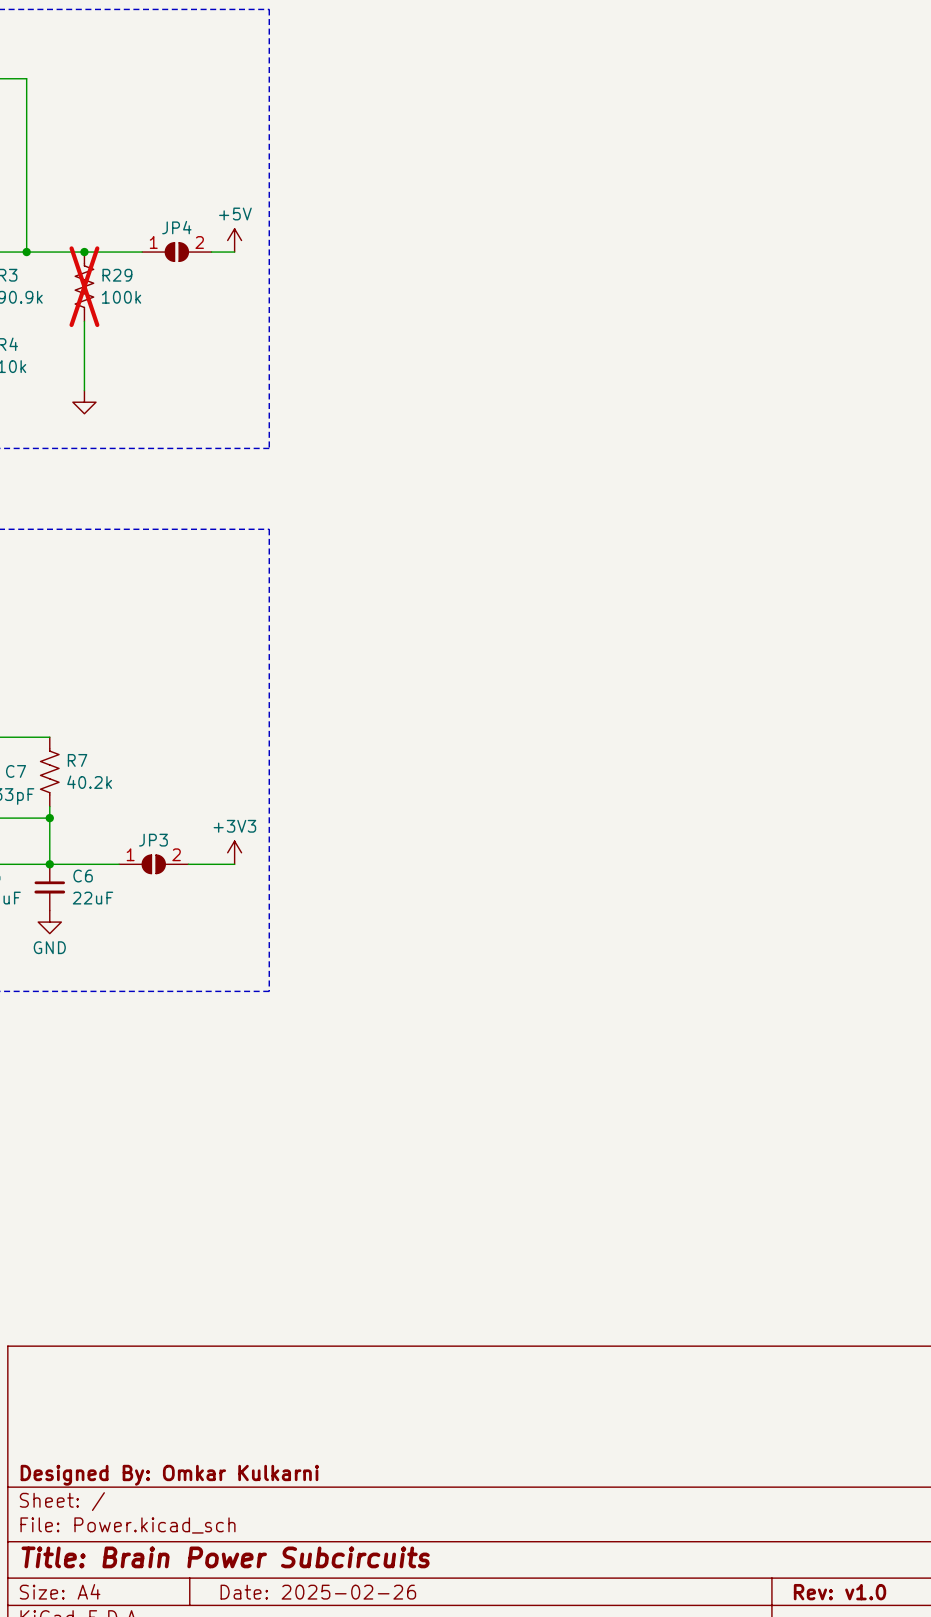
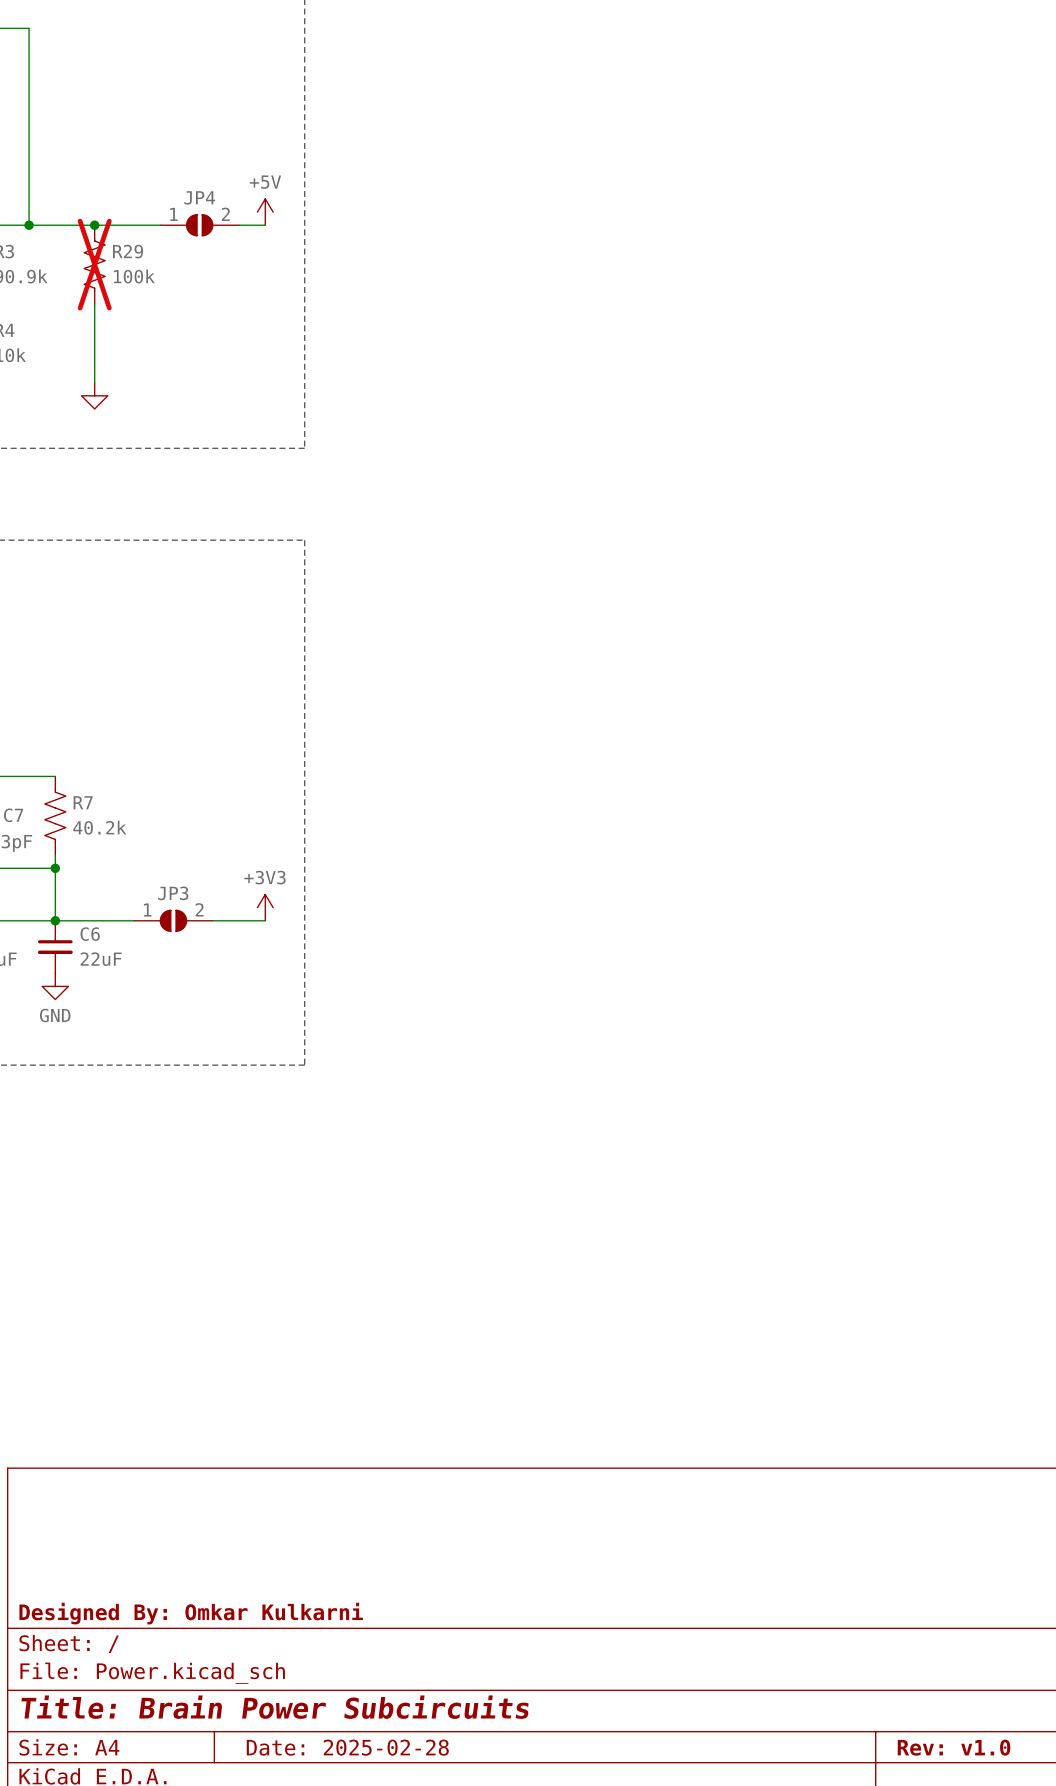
title block: Date: 2025-02-26 (318, 1592) -> Date: 2025-02-28 (347, 1747)

